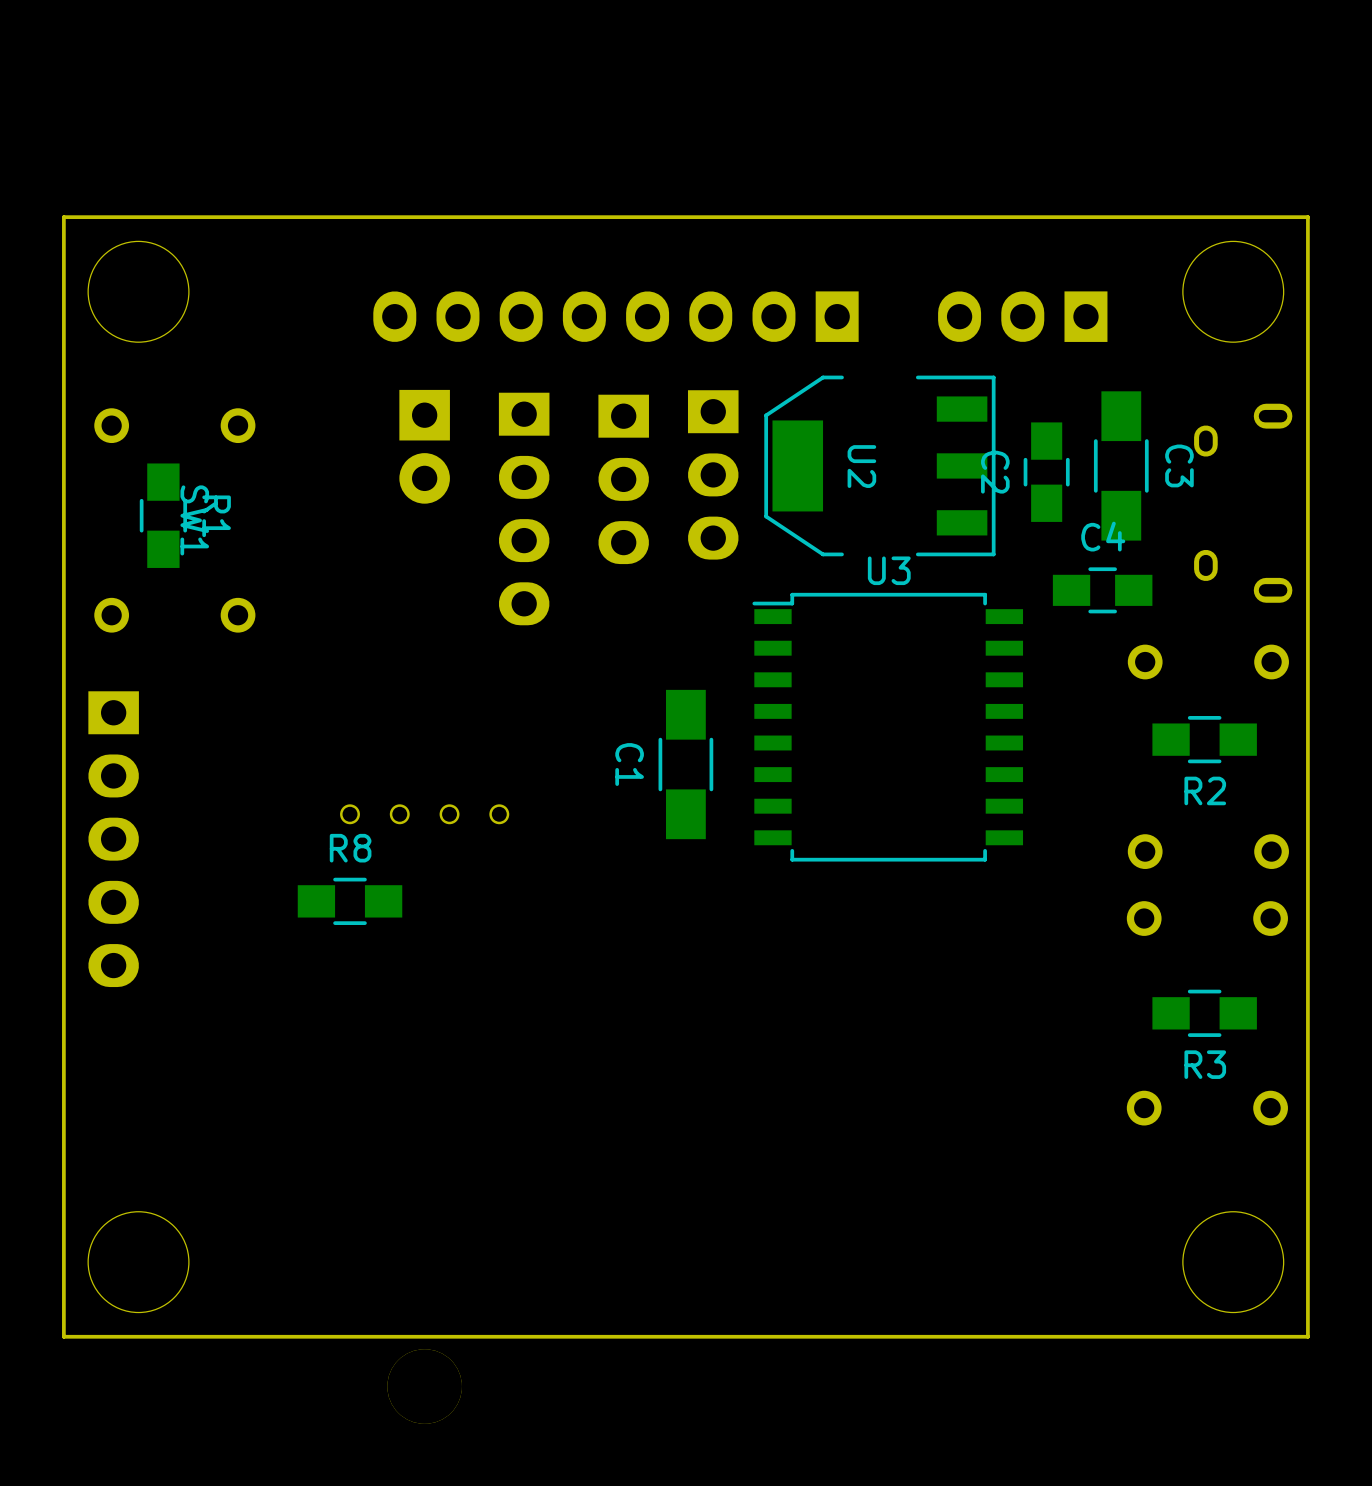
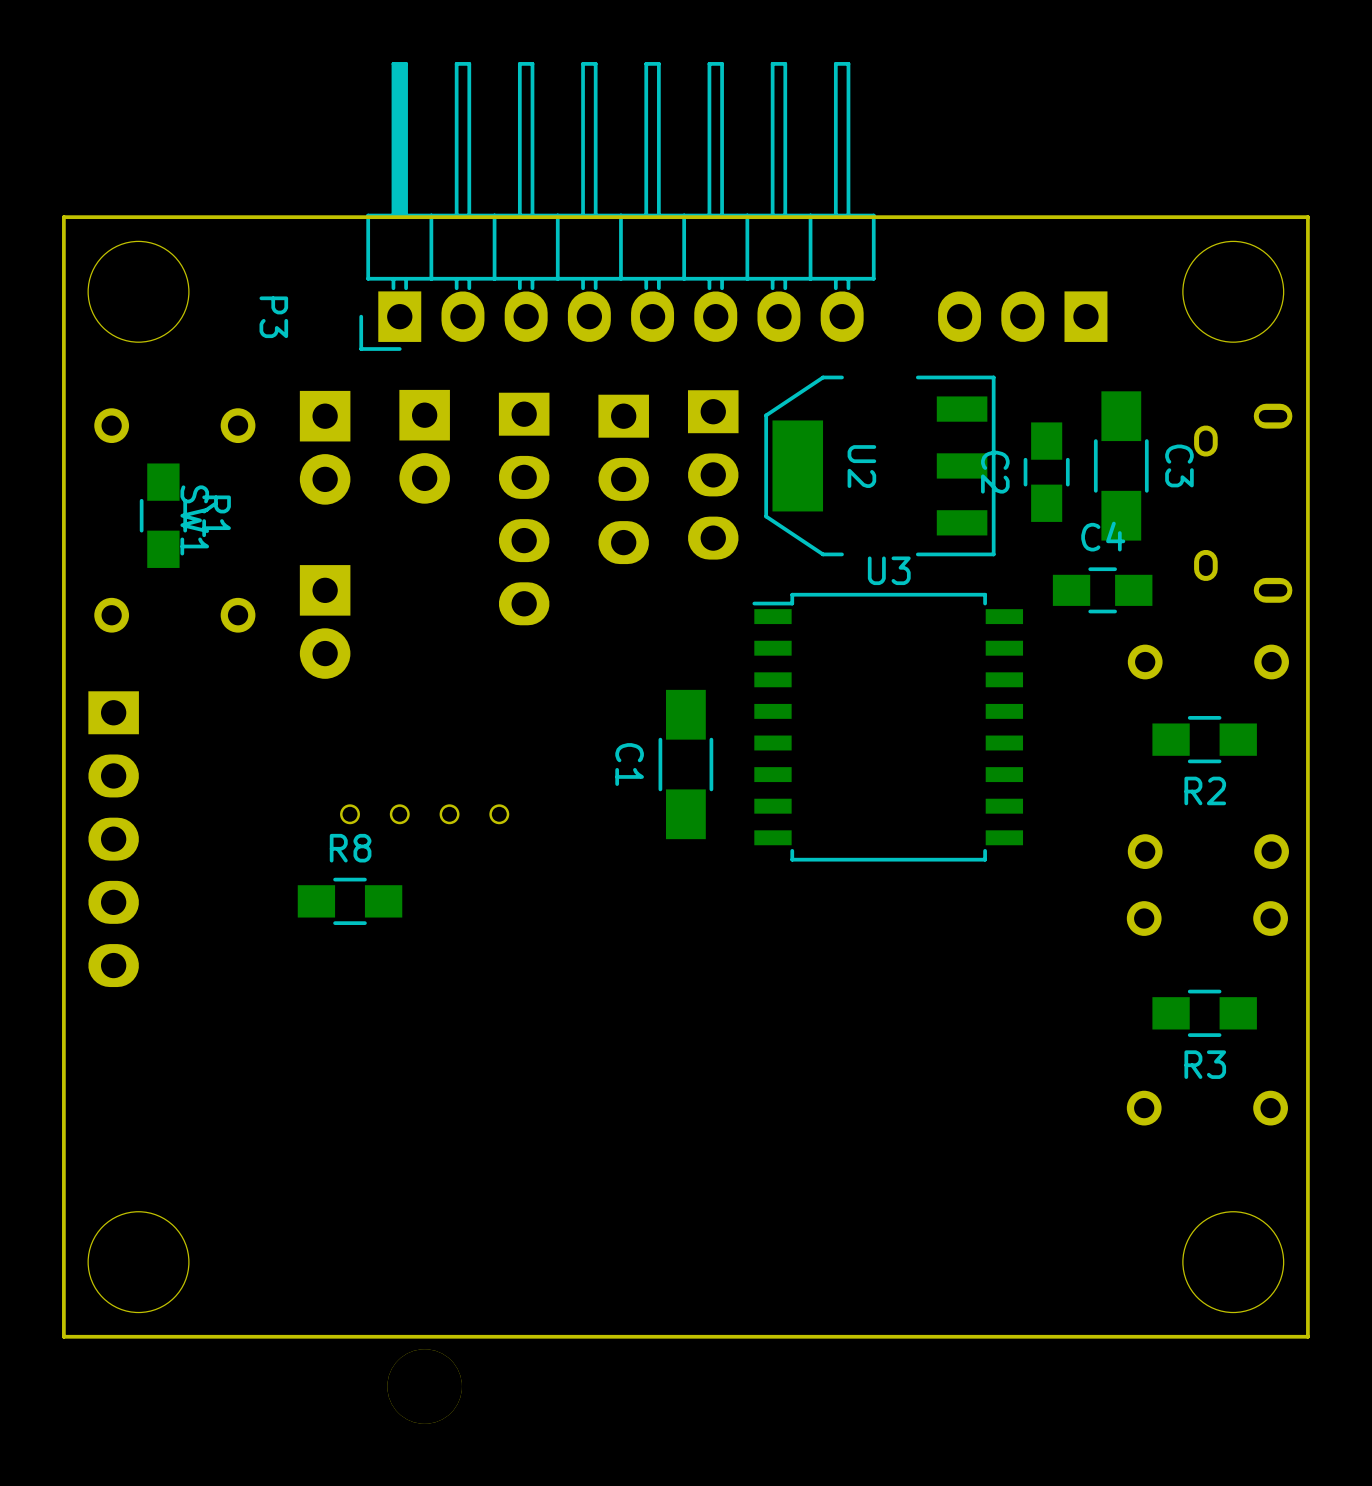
P3 side: top (615, 316) -> bottom (617, 206)
part: none -> (325, 447)
part: none -> (325, 621)

